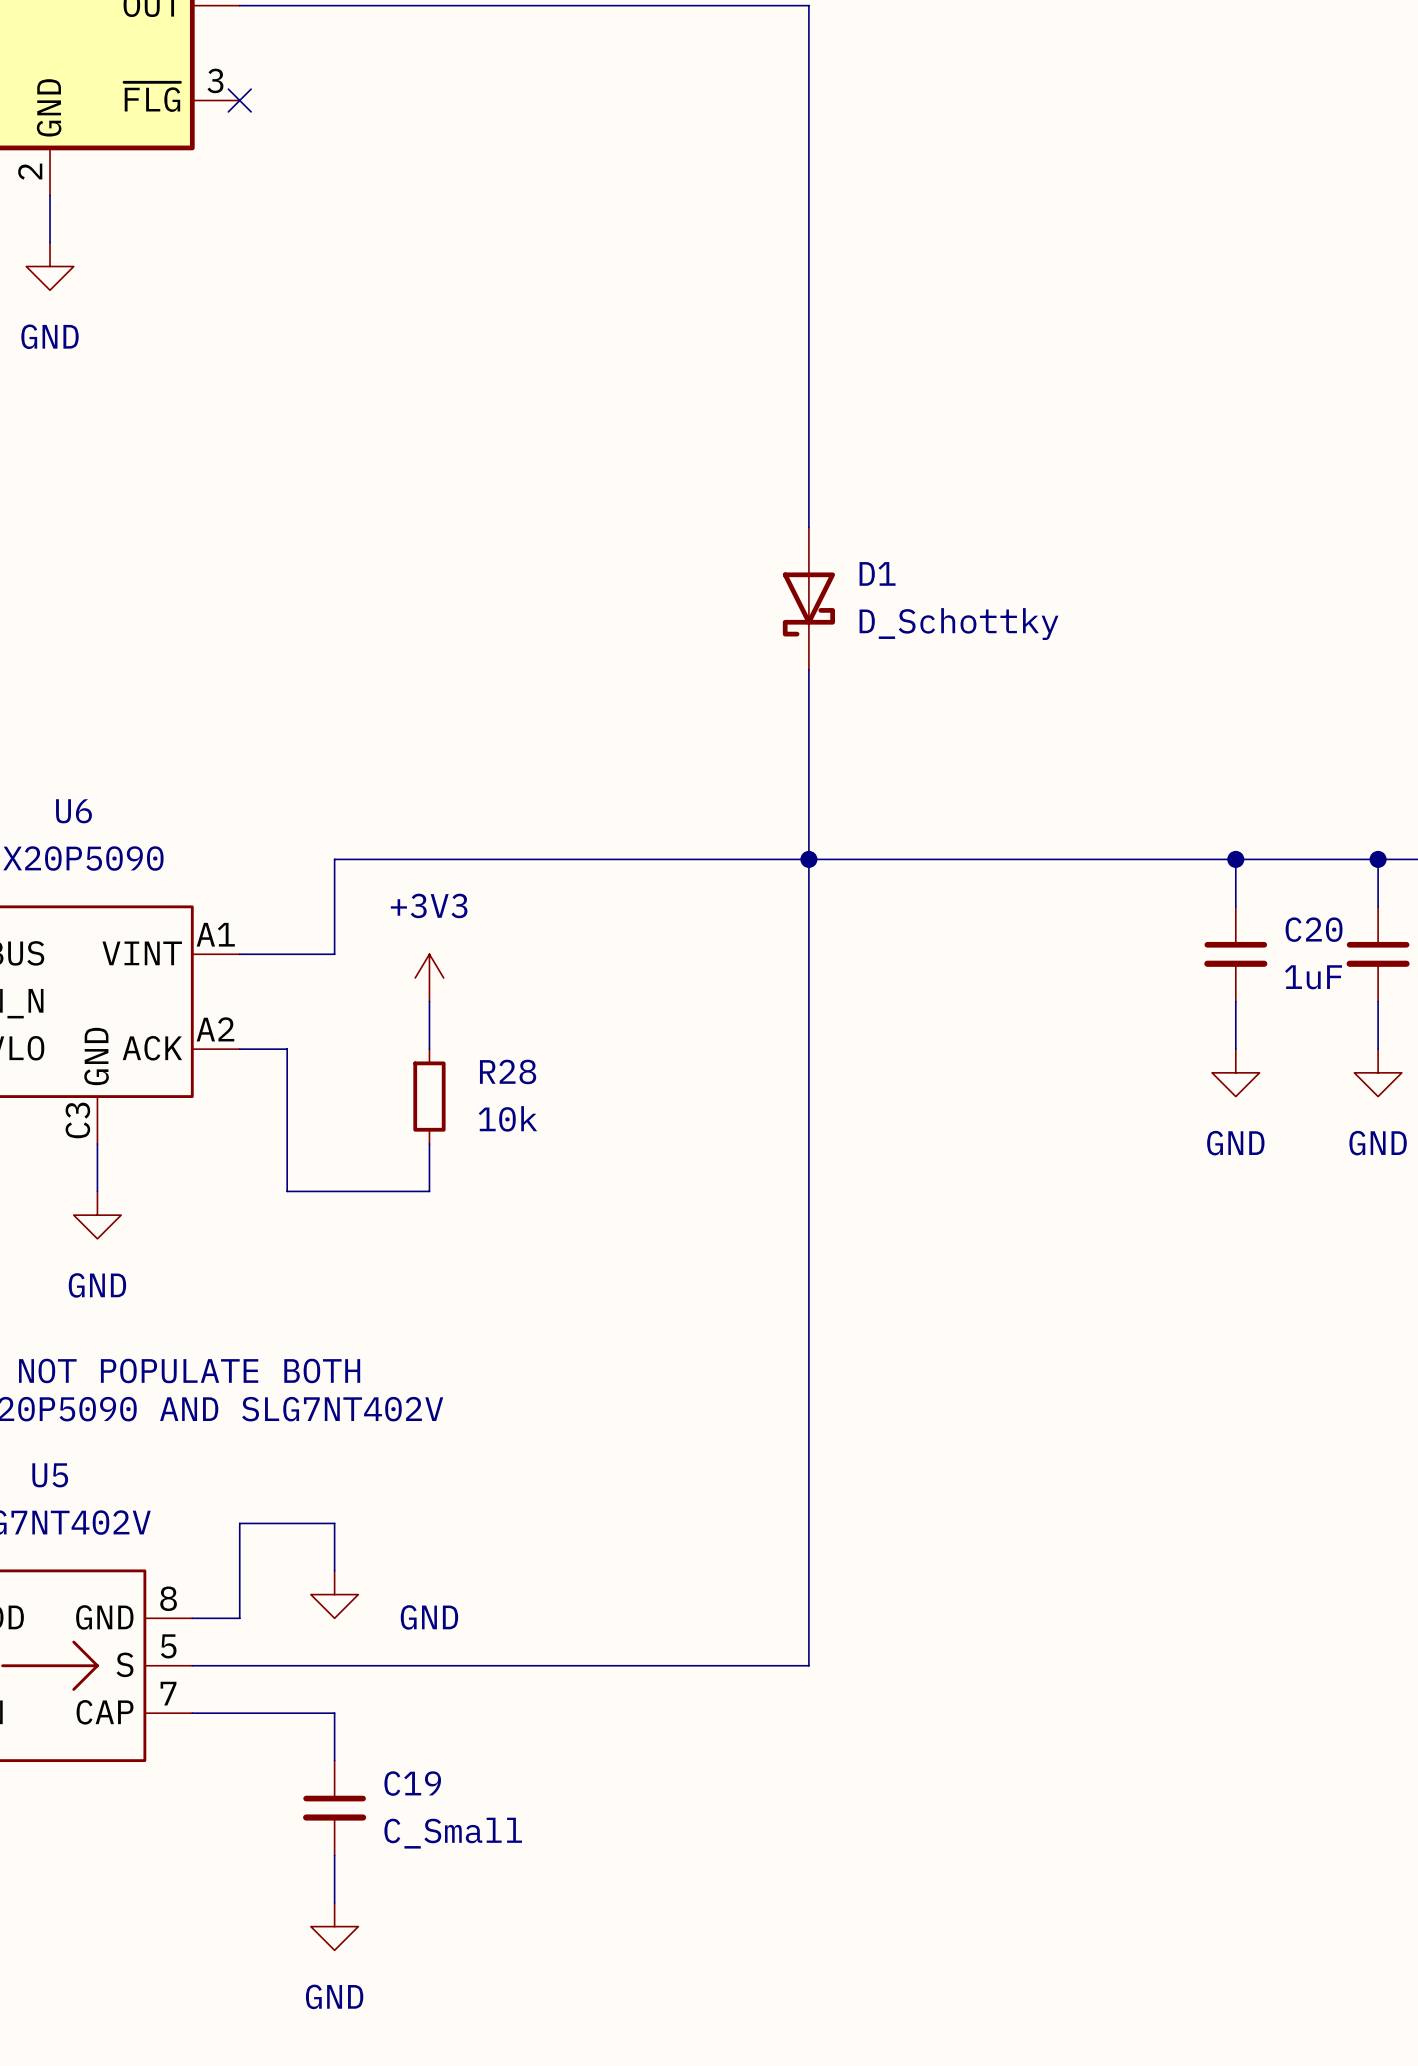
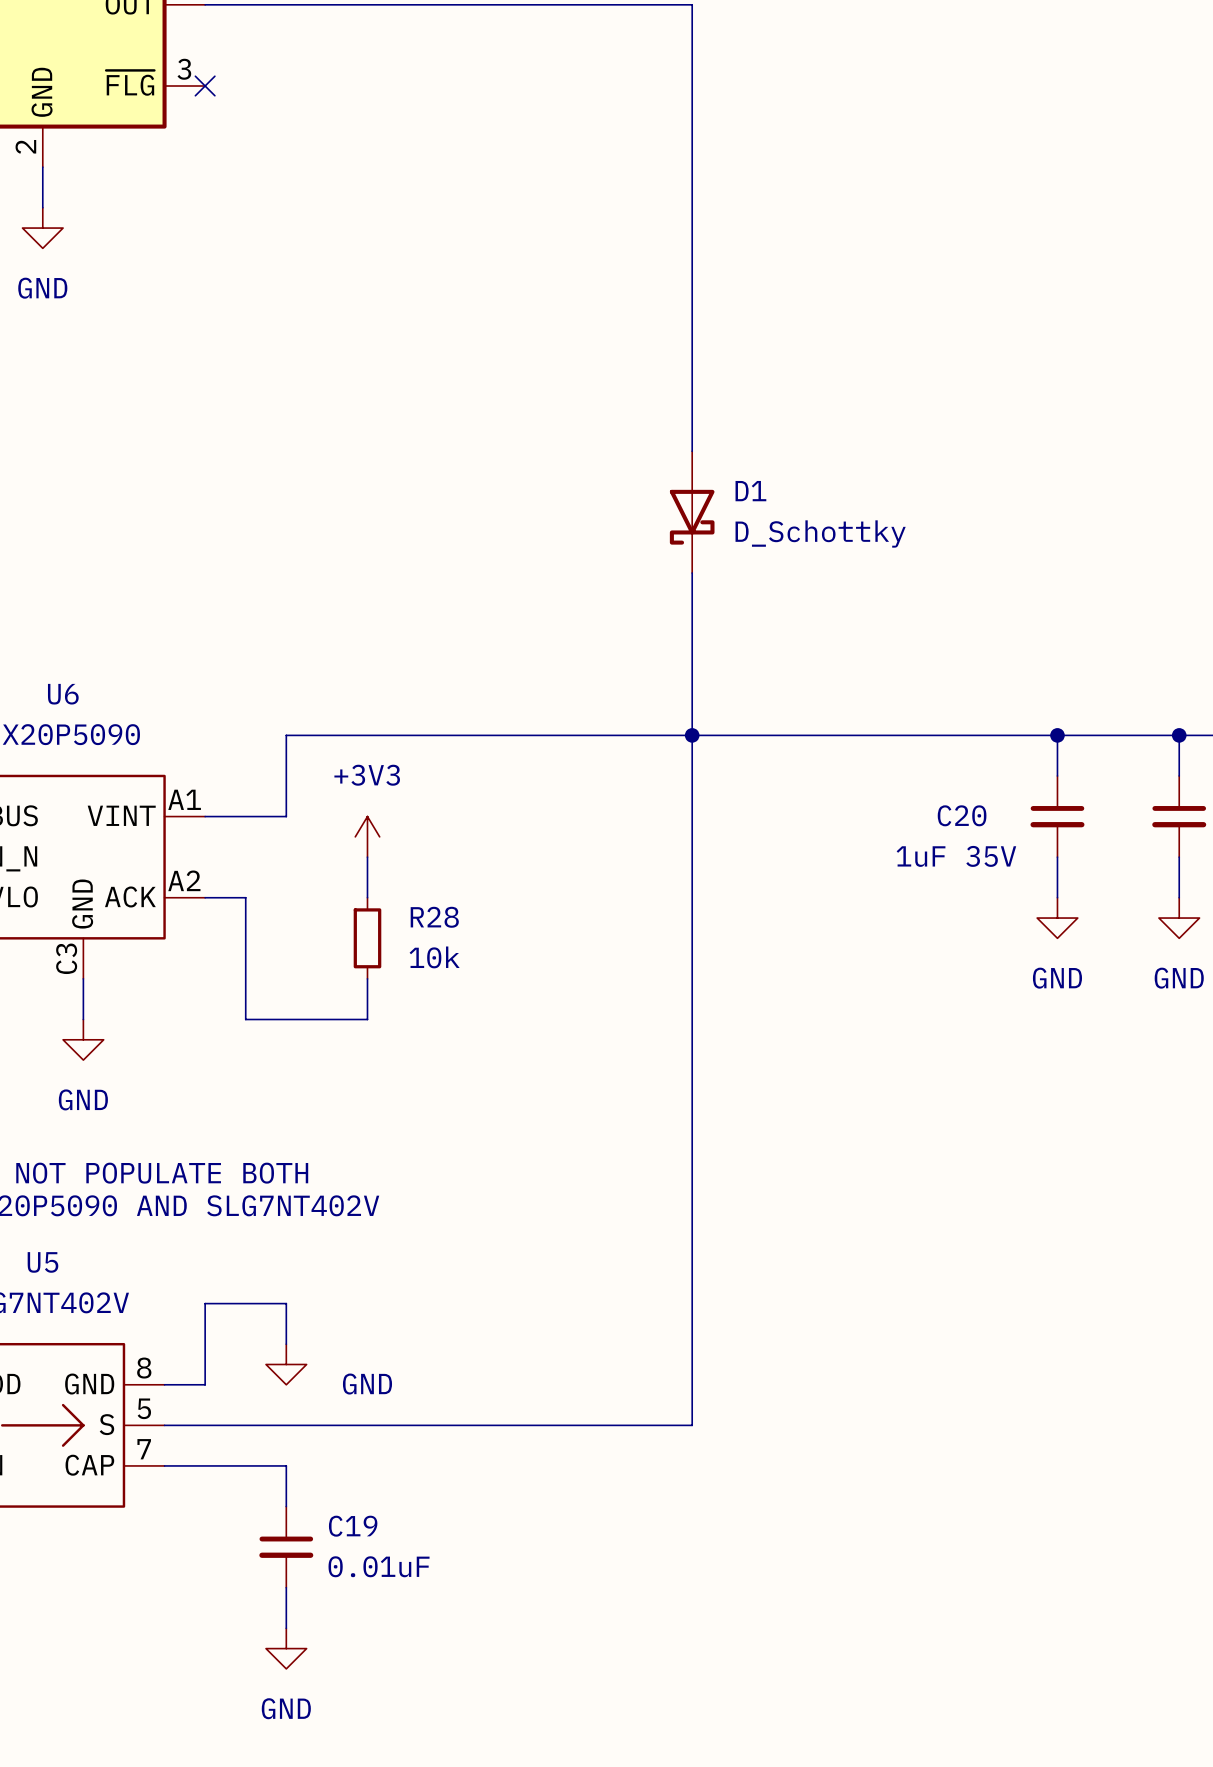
C20 name position: C20 (1314, 929) -> C20 (962, 815)
C20 value: 1uF (1313, 977) -> 1uF 35V (956, 856)
C19 value: C_Small (453, 1833) -> 0.01uF (379, 1566)

